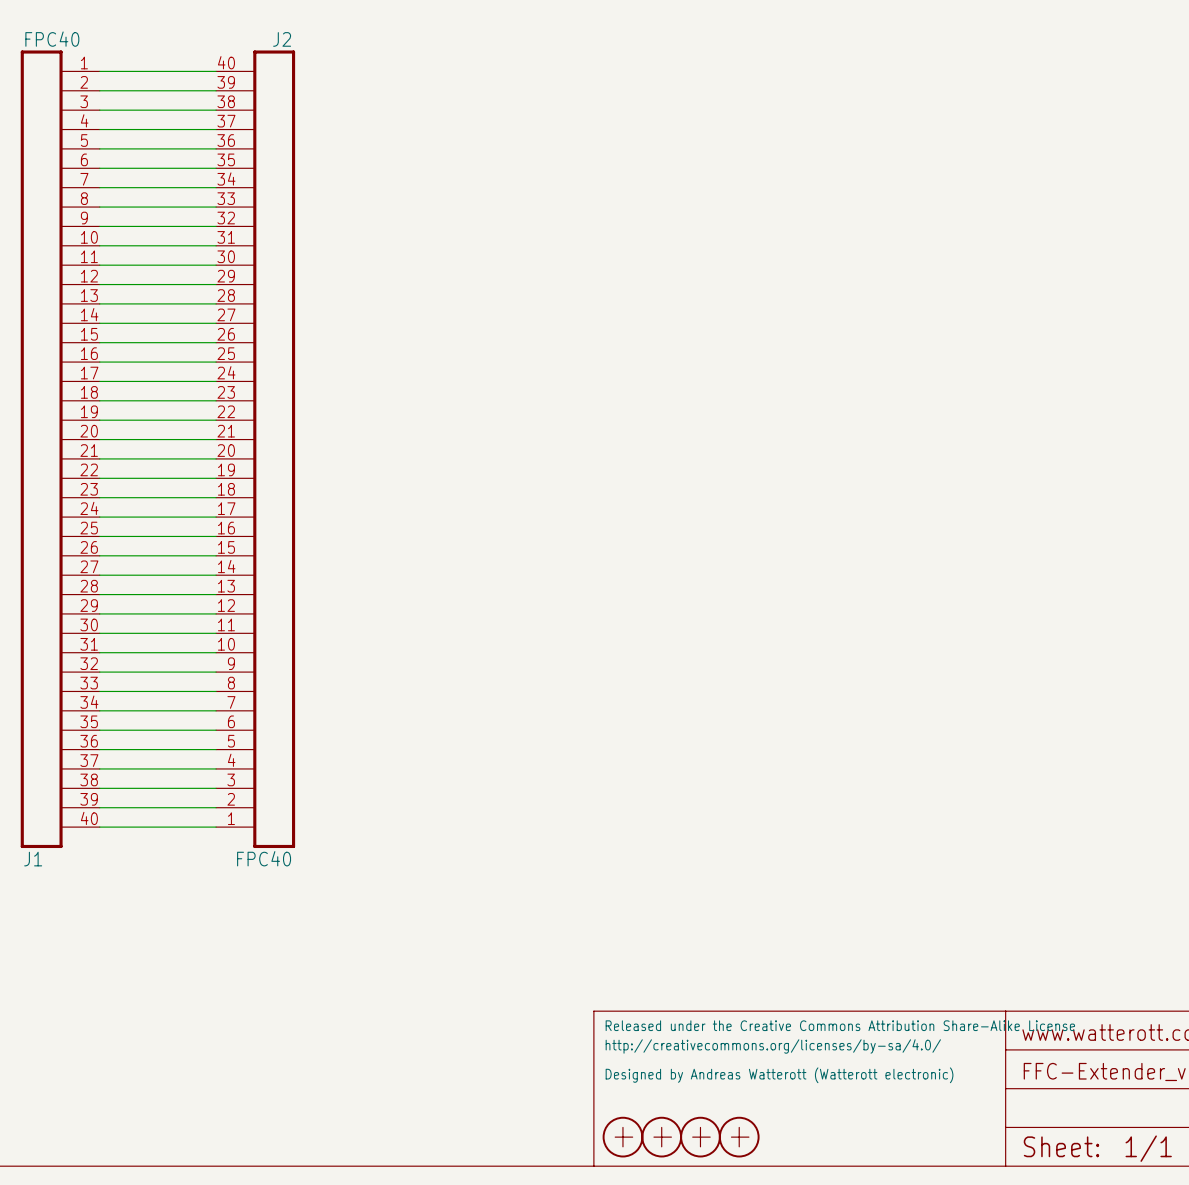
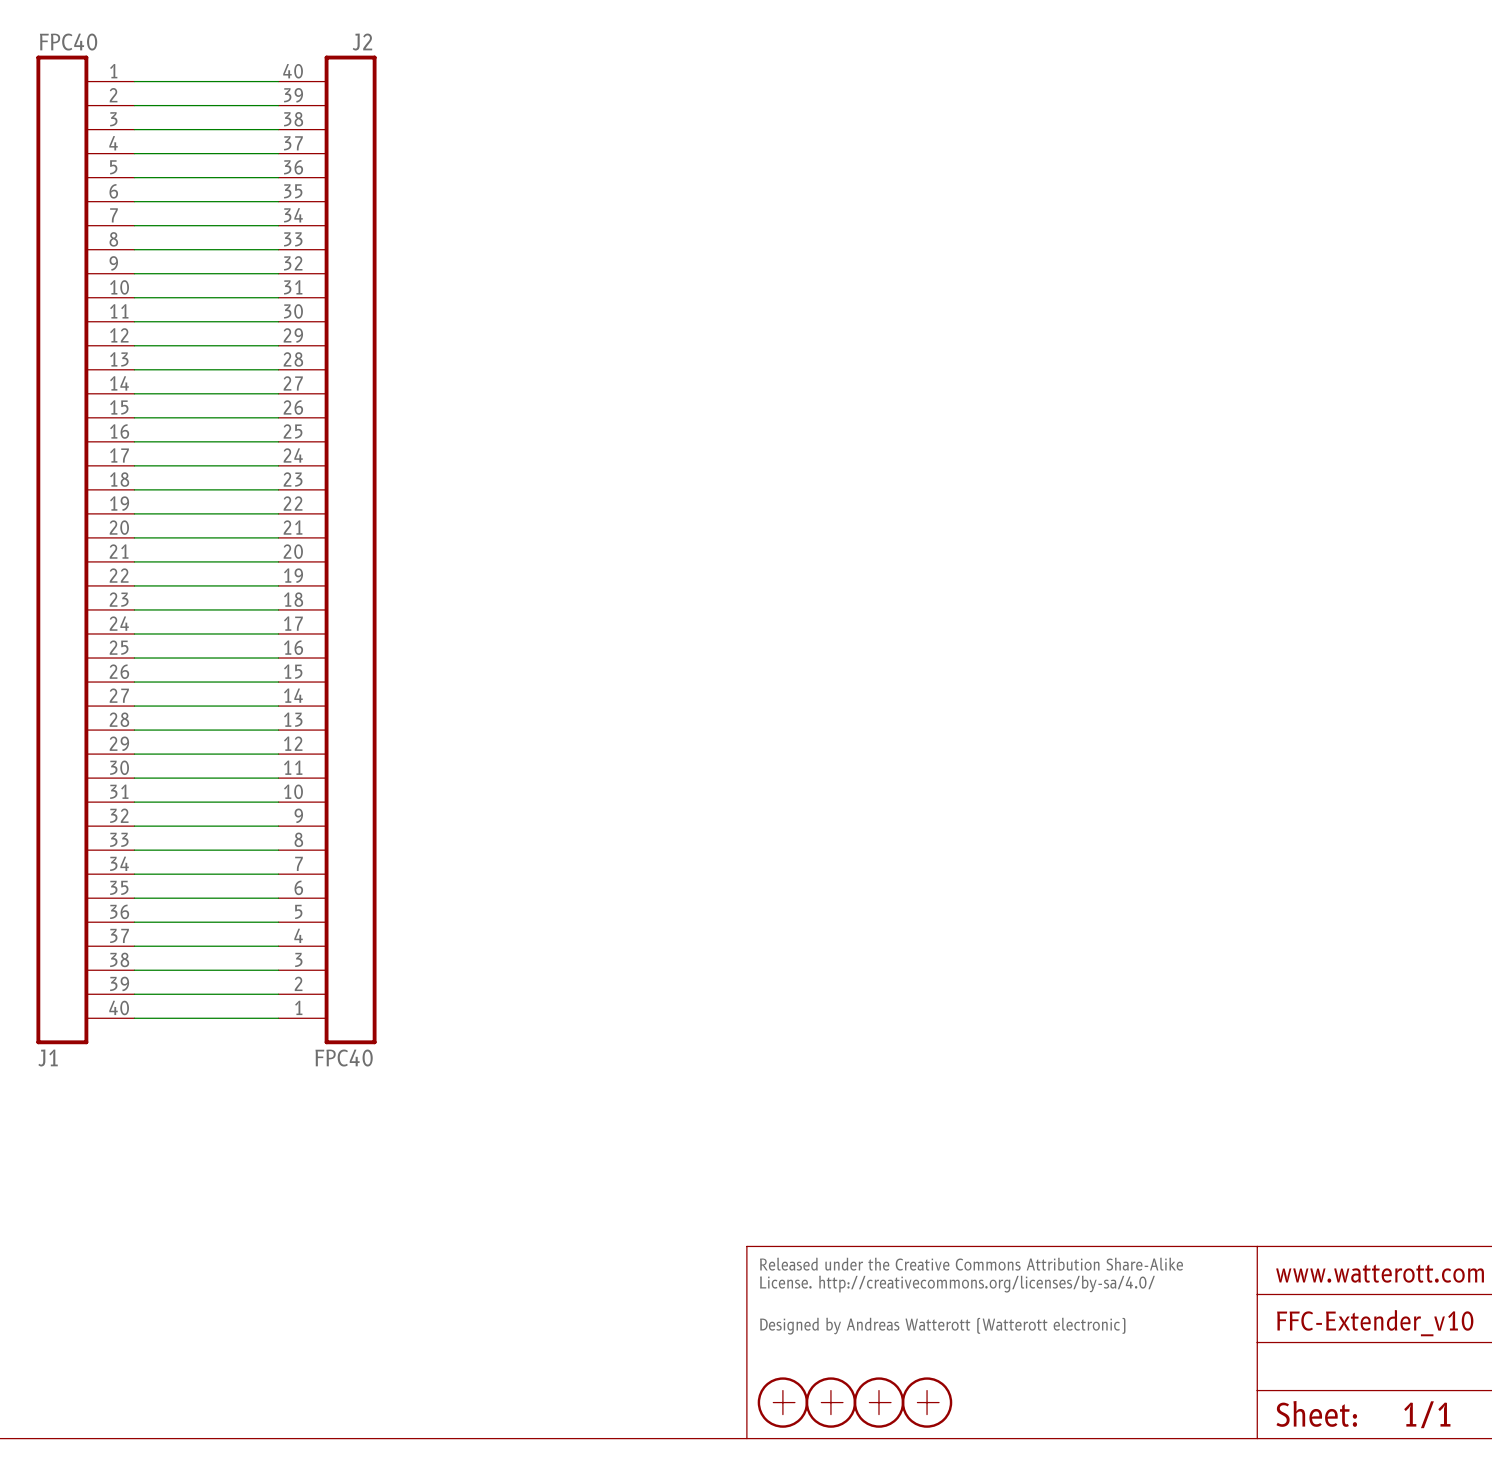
text: Released under the Creative Commons Attribution Share-Alike License (840, 1025) -> License. http://creativecommons.org/licenses/by-sa/4.0/ (957, 1284)
text: http://creativecommons.org/licenses/by-sa/4.0/ (773, 1046) -> none

